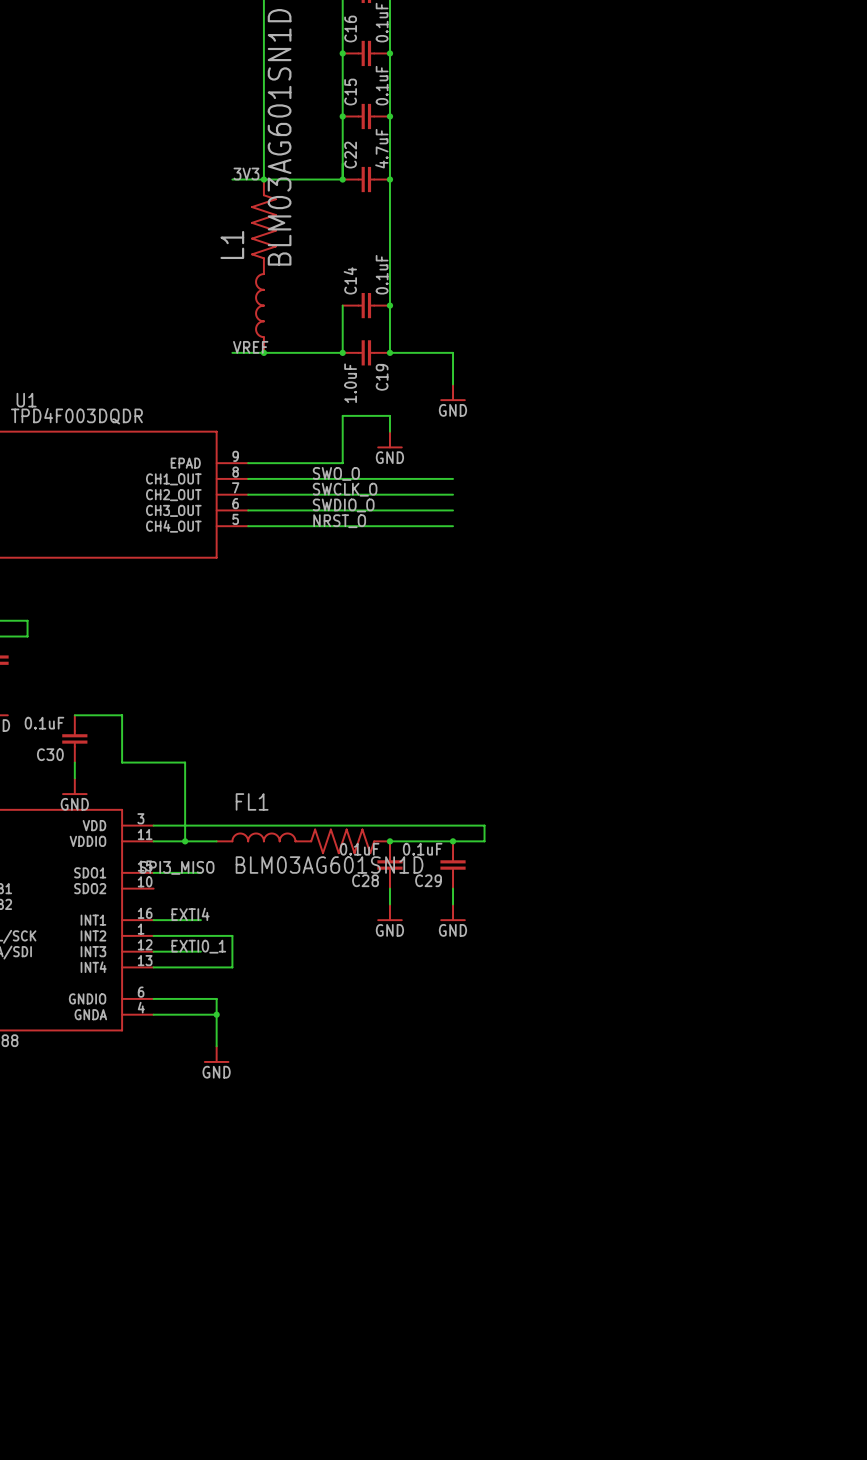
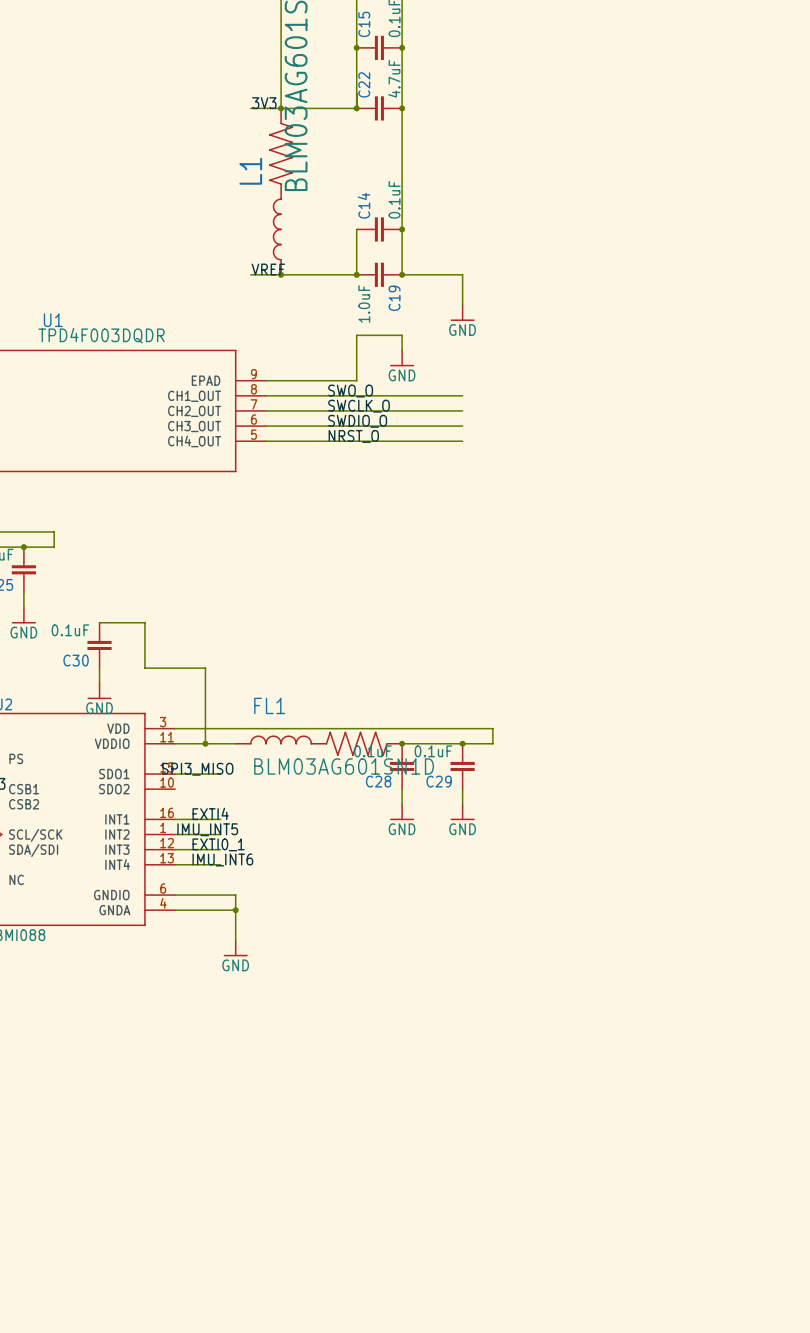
label: none -> IMU_INT5 (207, 829)
wire: (200, 935) (232, 935) (232, 967) (200, 967) -> none
label: none -> IMU_INT6 (222, 860)

